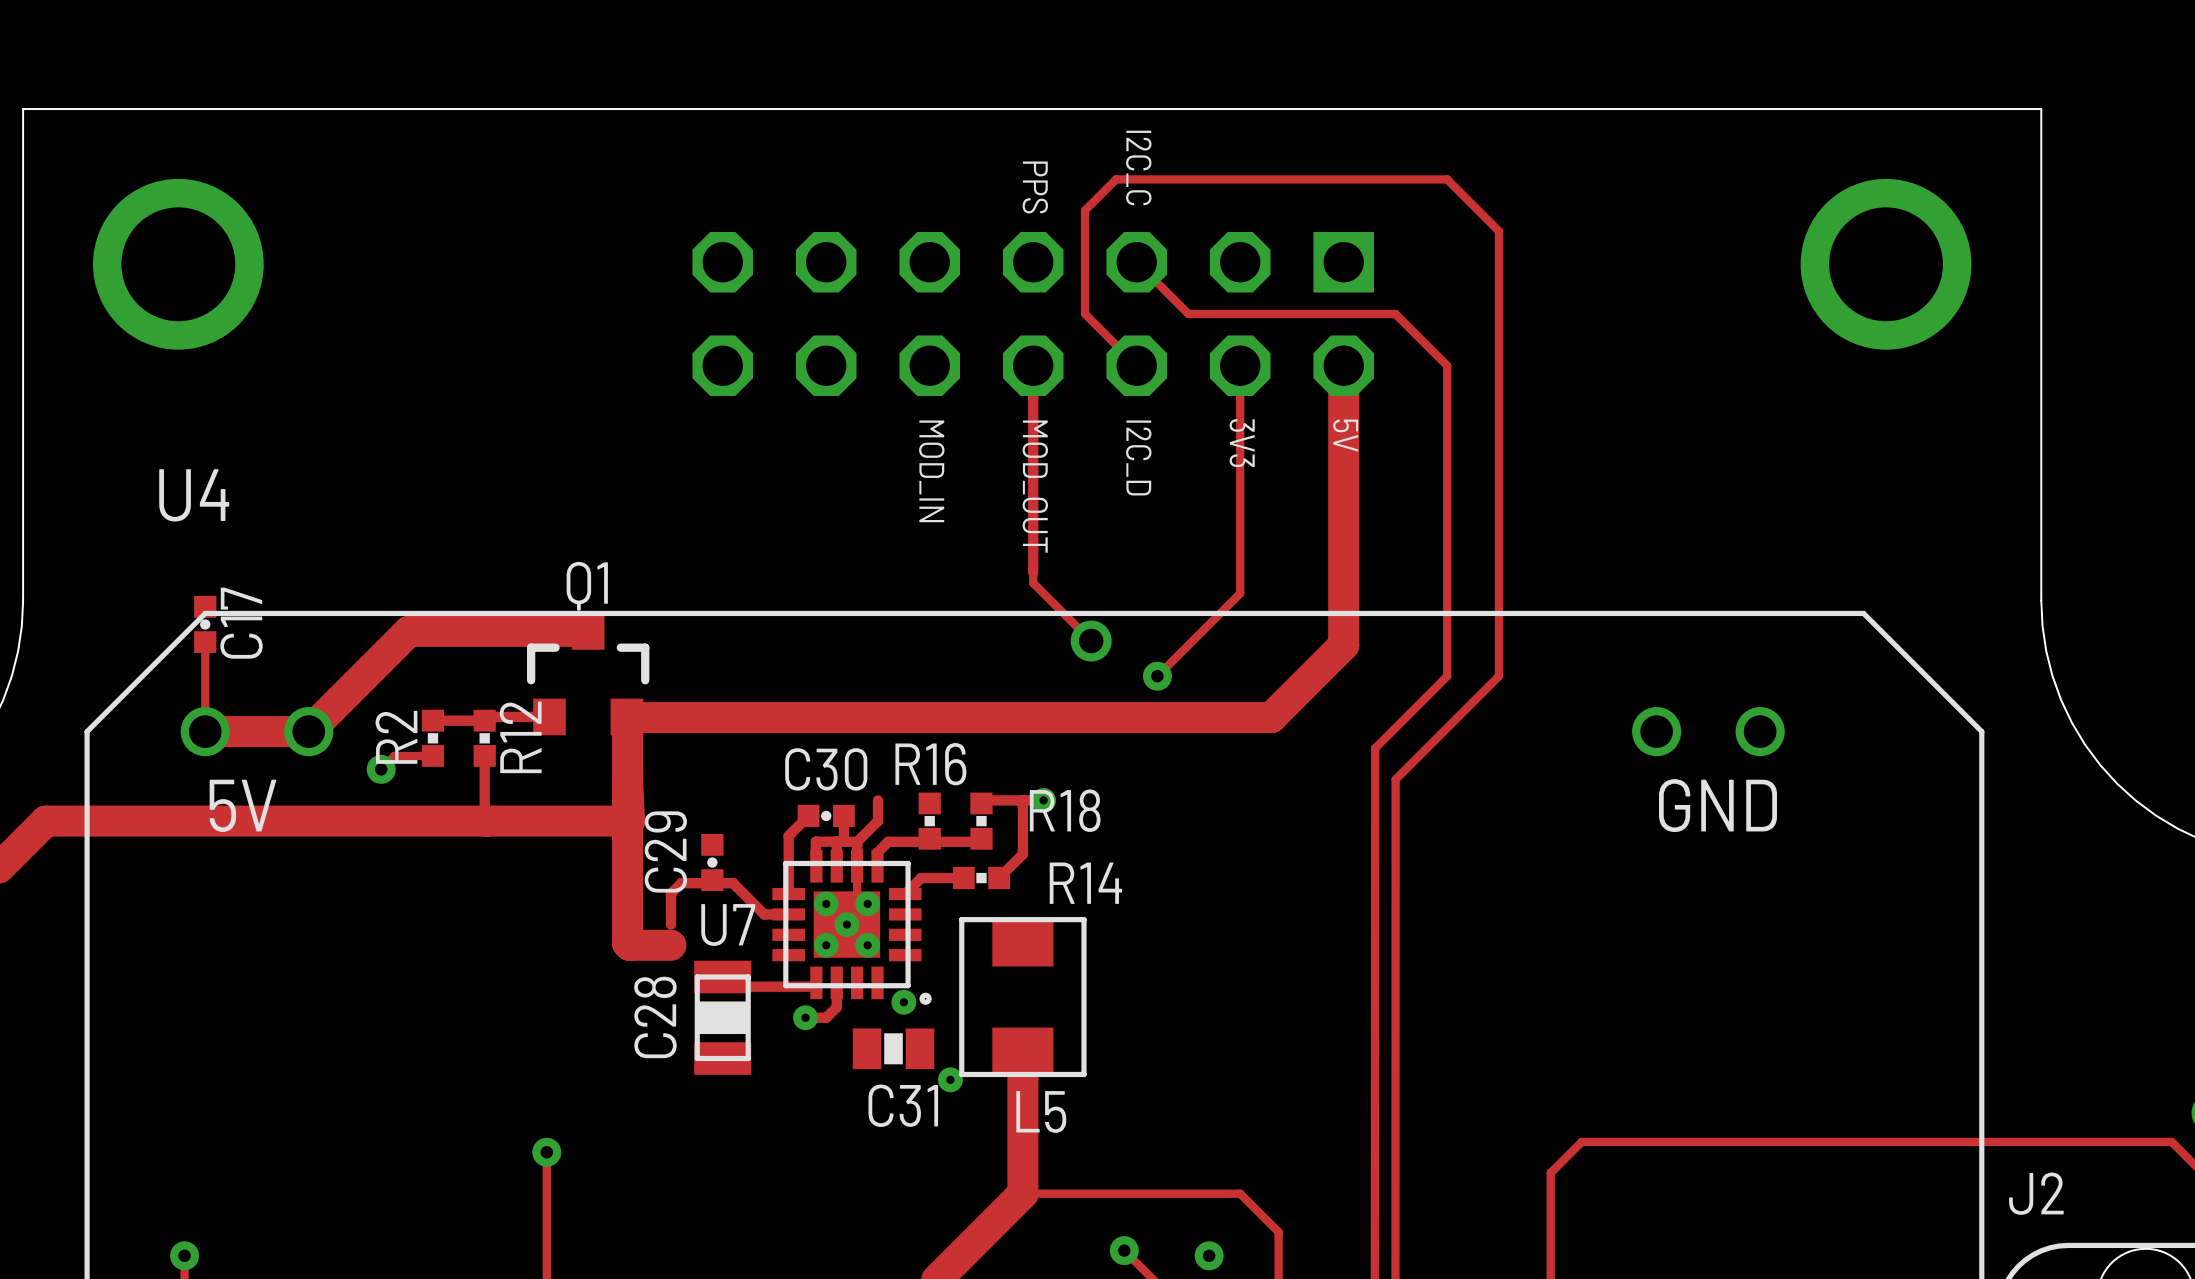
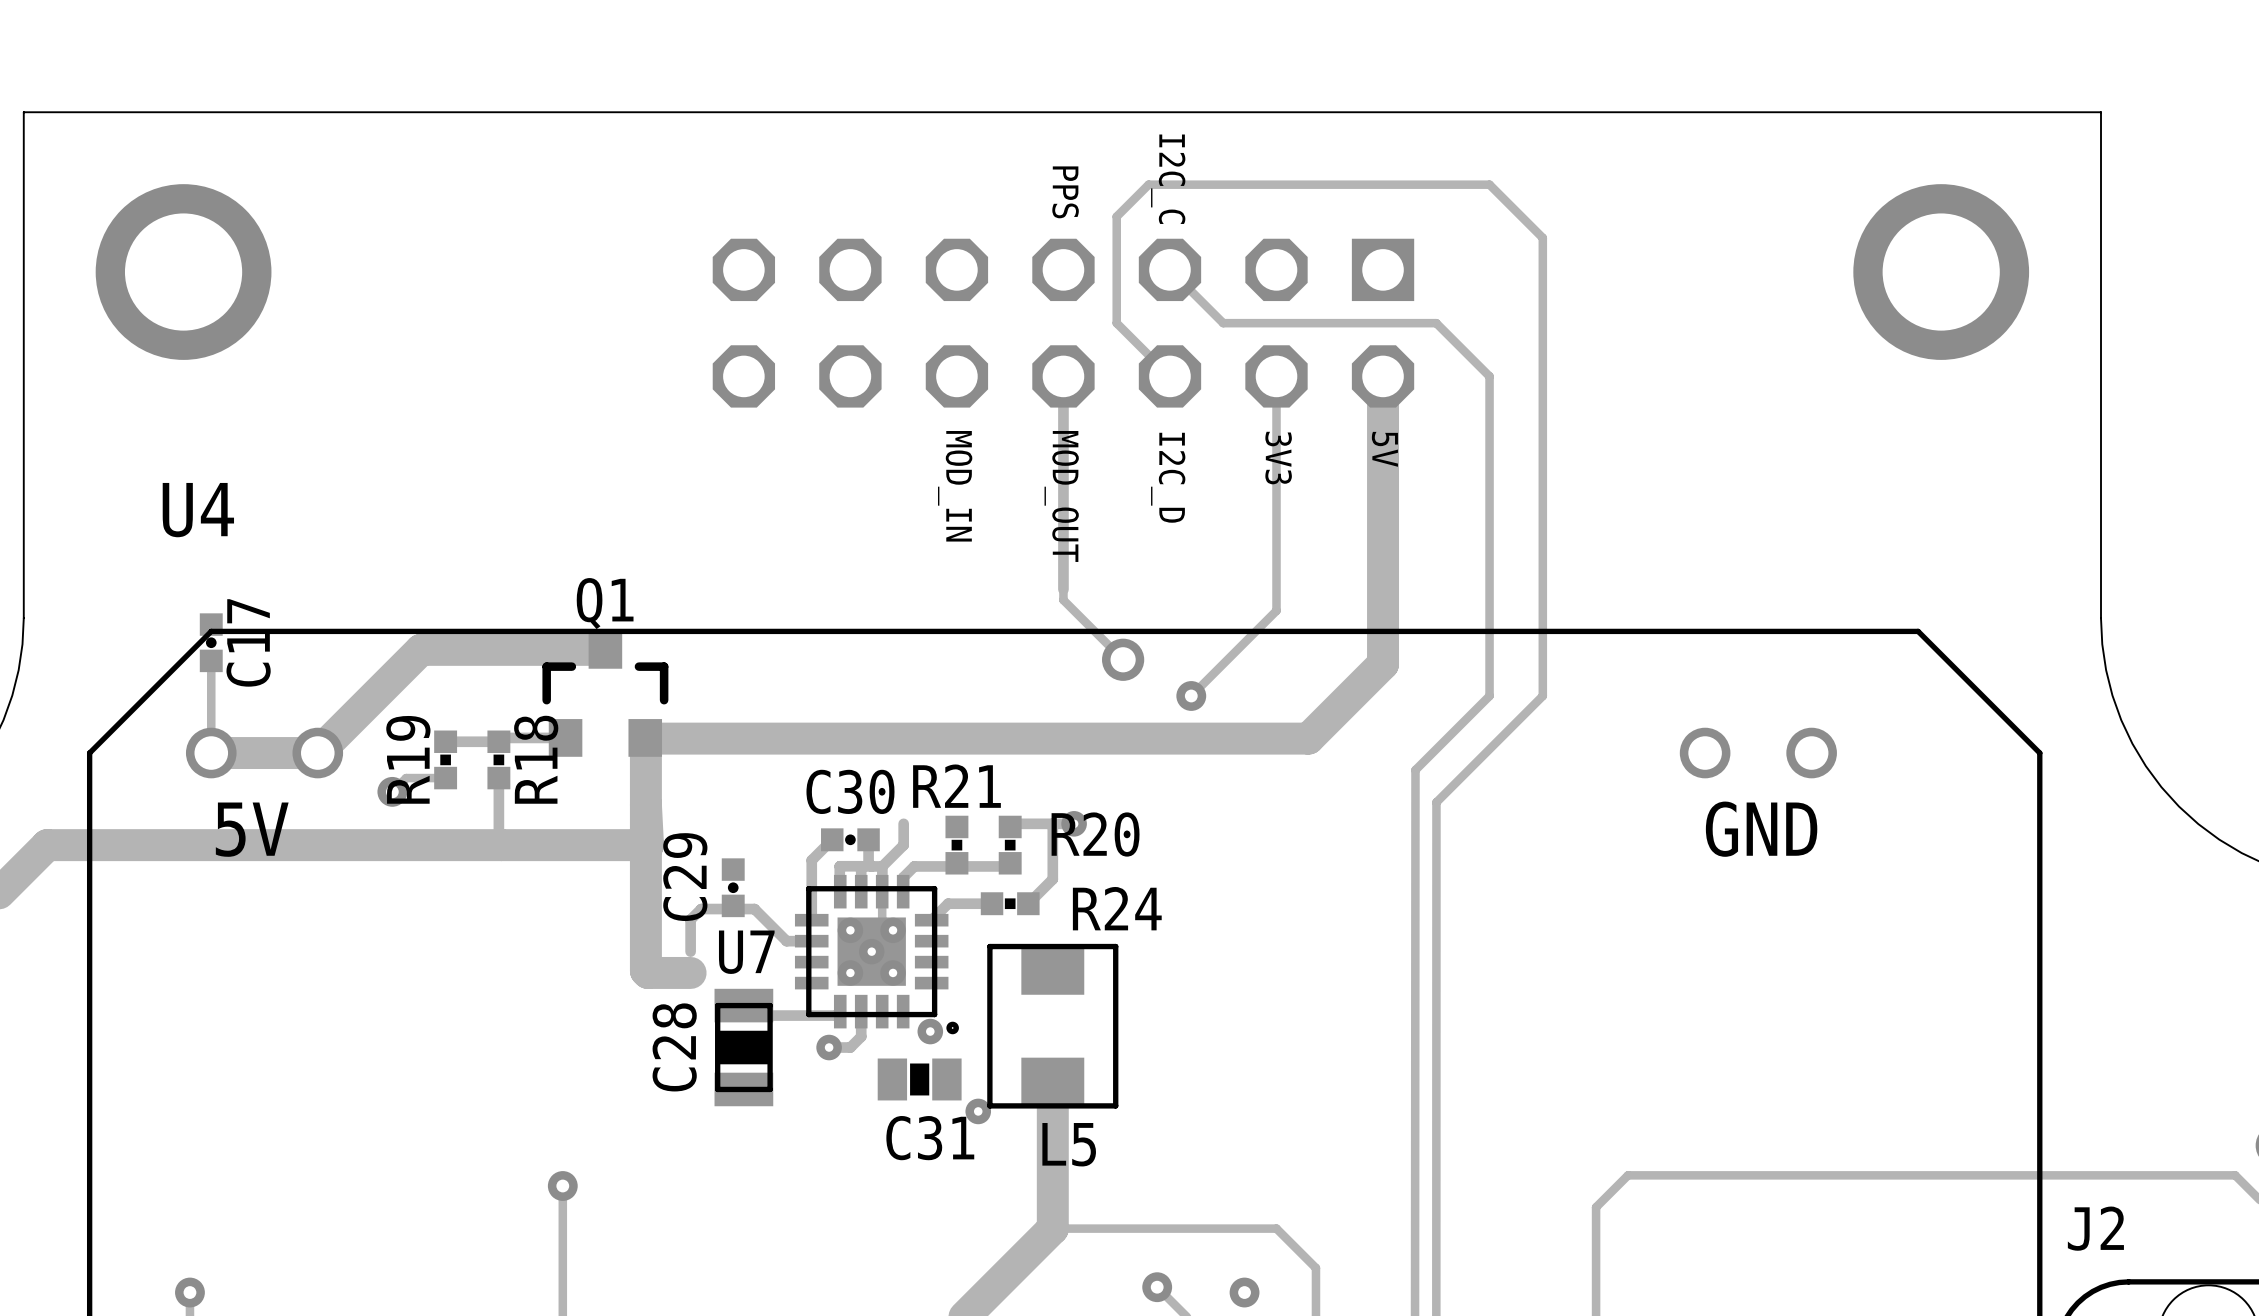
R2 name: R2 (396, 737) -> R19 (408, 759)
R12 name: R12 (520, 737) -> R18 (536, 759)
R16 name: R16 (930, 764) -> R21 (956, 786)
R18 name: R18 (1065, 810) -> R20 (1095, 834)
R14 name: R14 (1085, 883) -> R24 (1117, 908)

